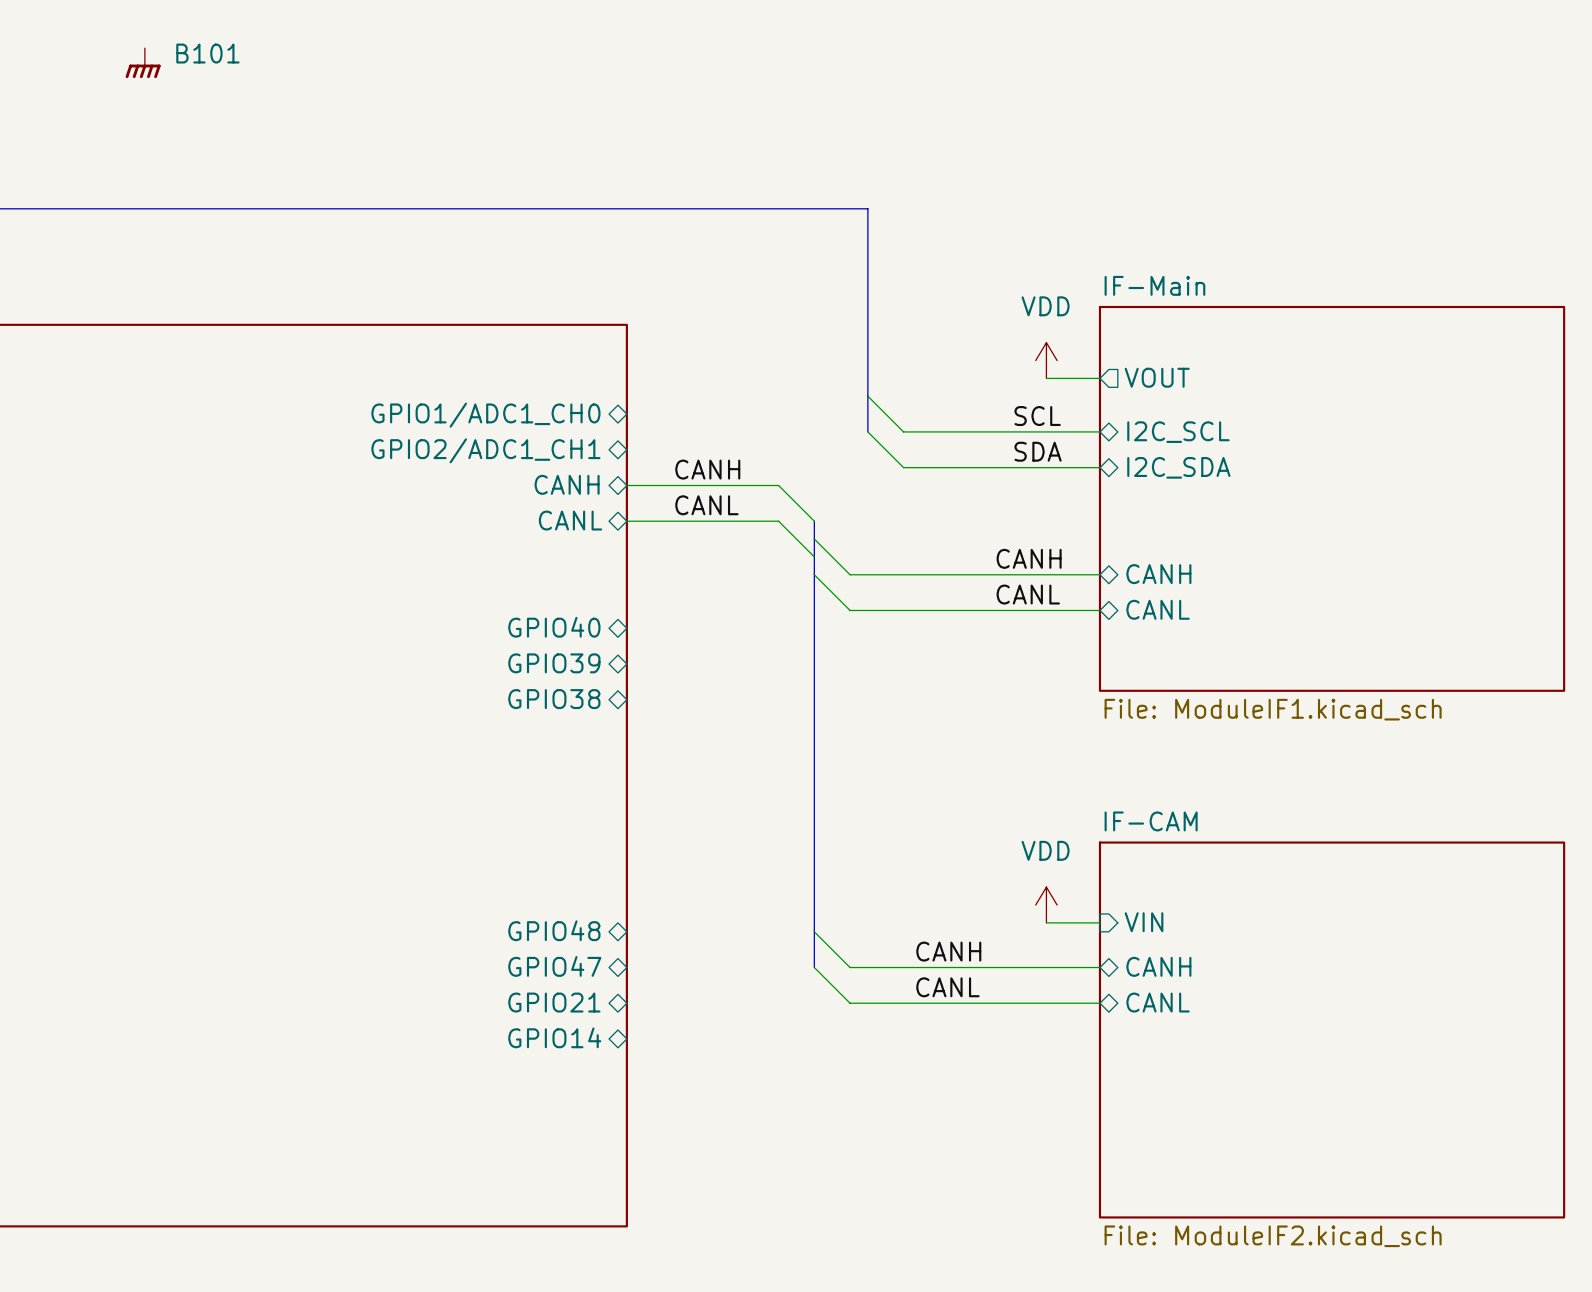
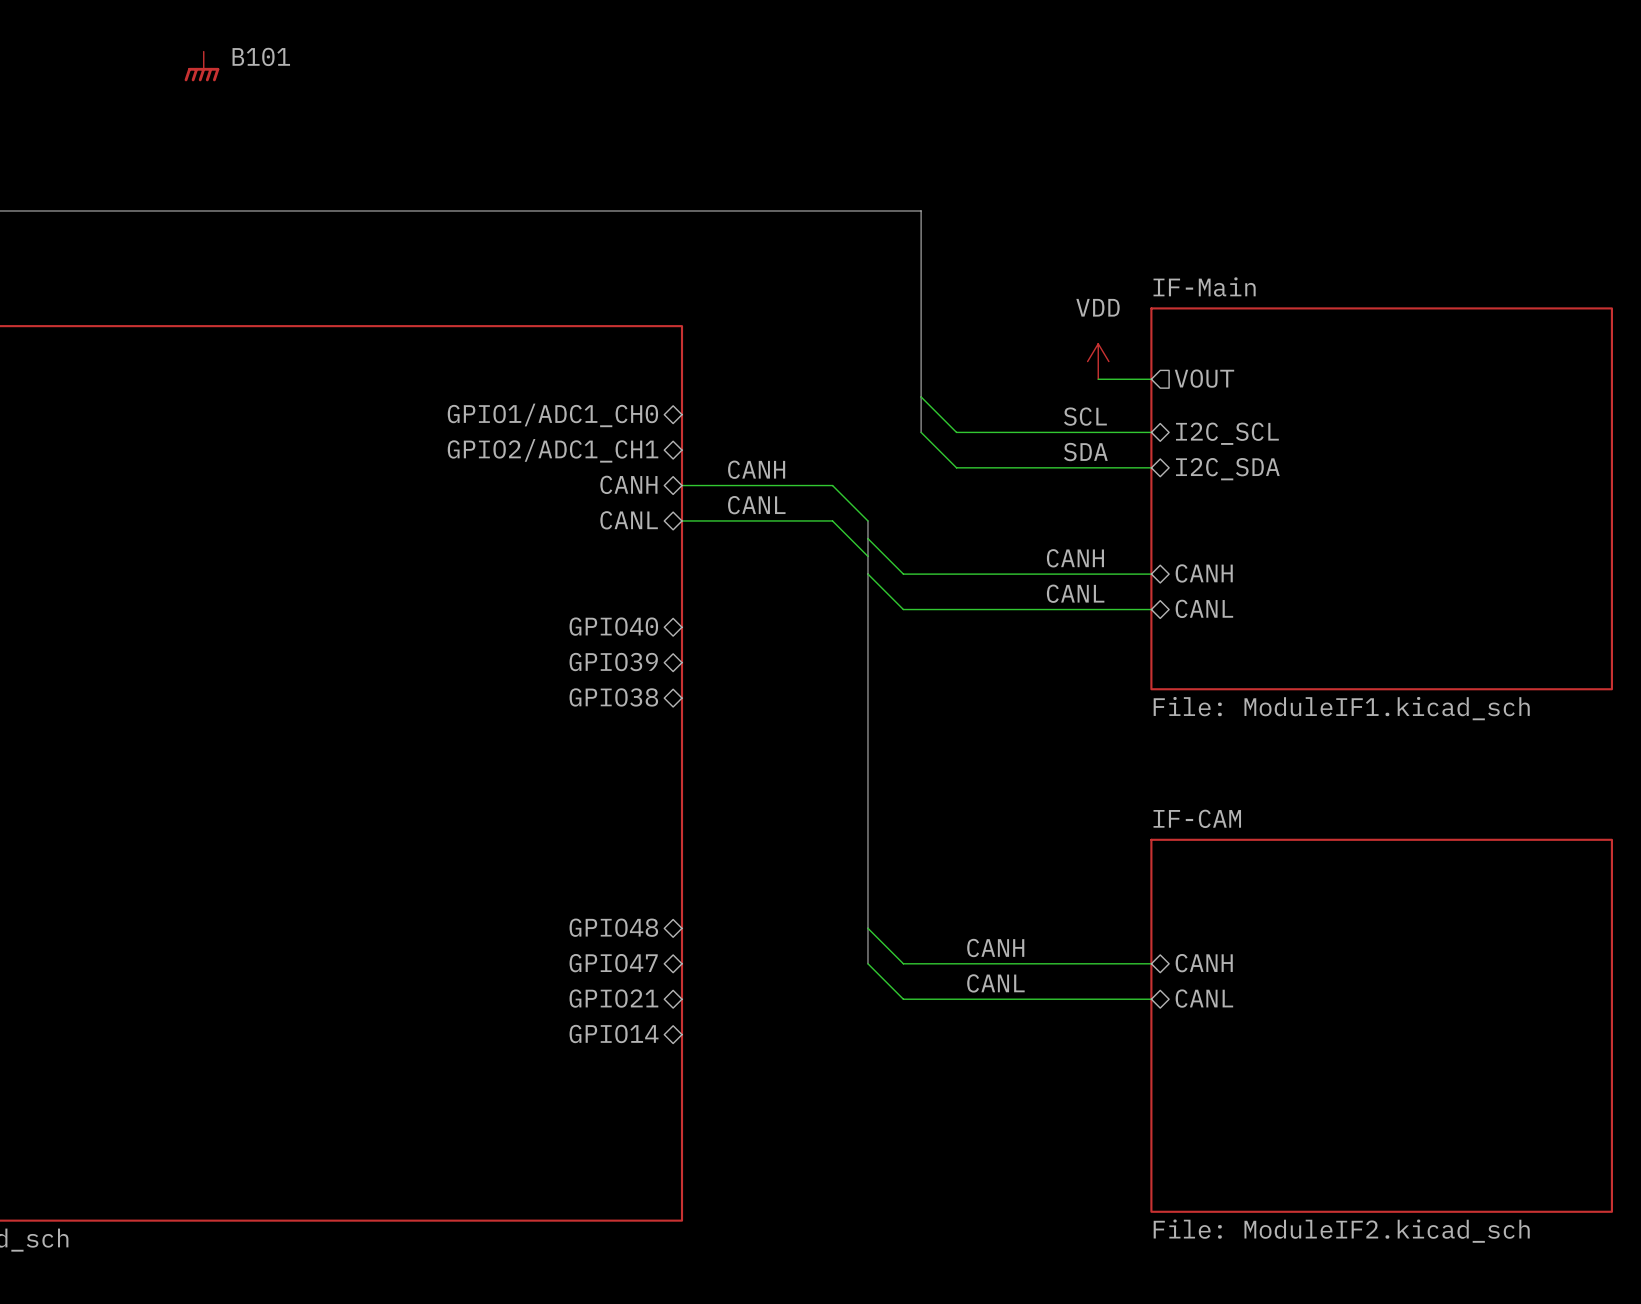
power symbol: VDD (1046, 905) -> none
wire: (1046, 922) (1099, 922) -> none
sheet pin: VIN (1144, 922) -> none

